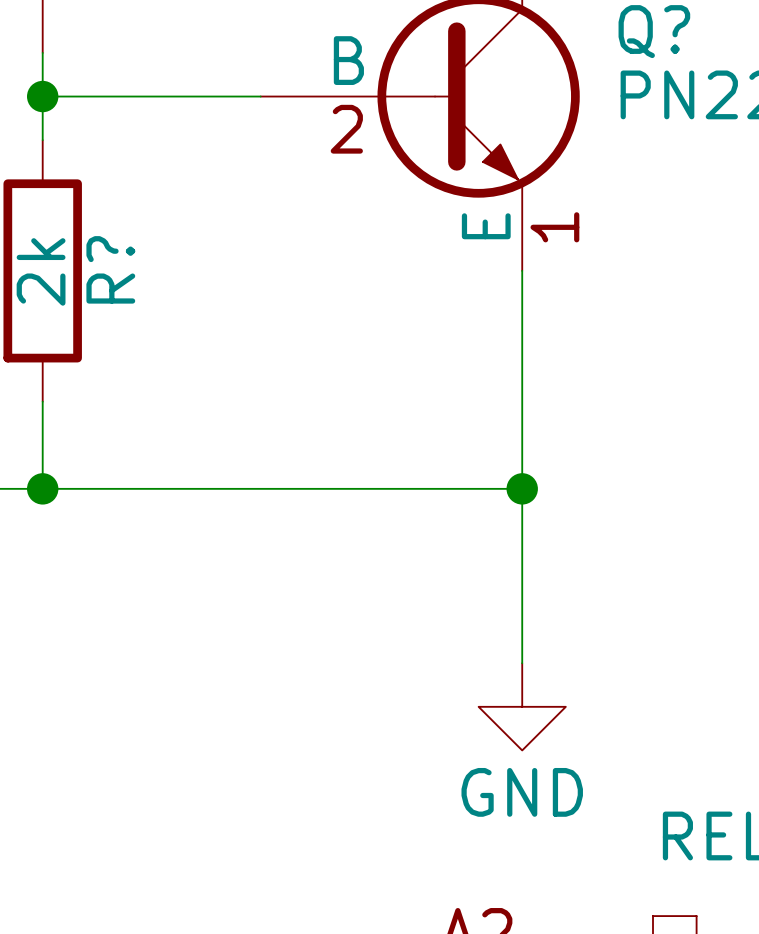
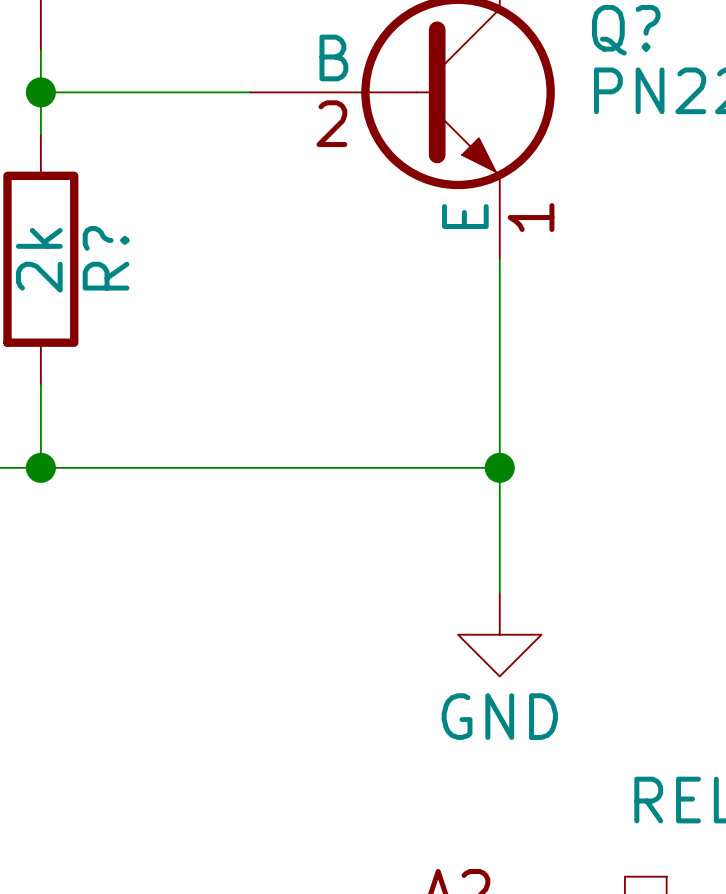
power symbol position: GND (522, 706) -> GND (499, 634)

